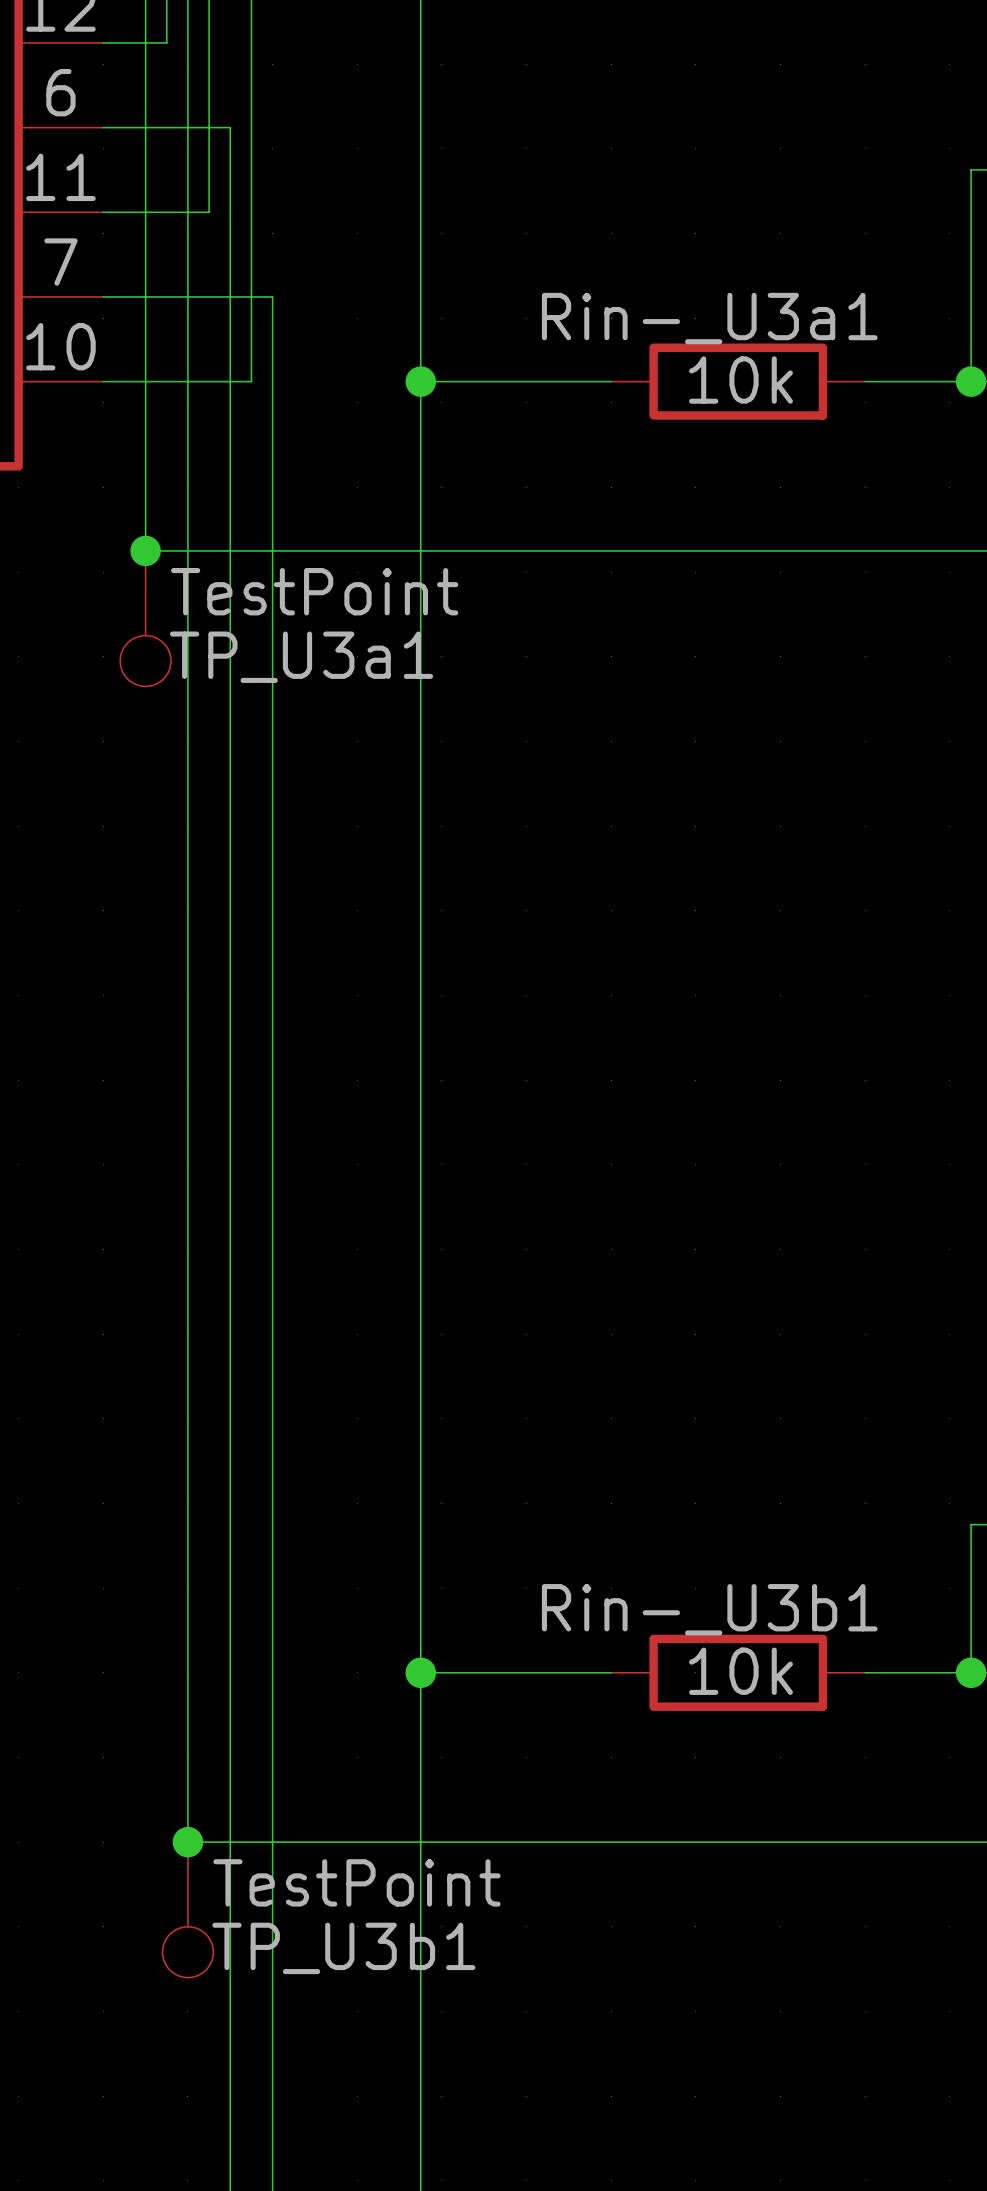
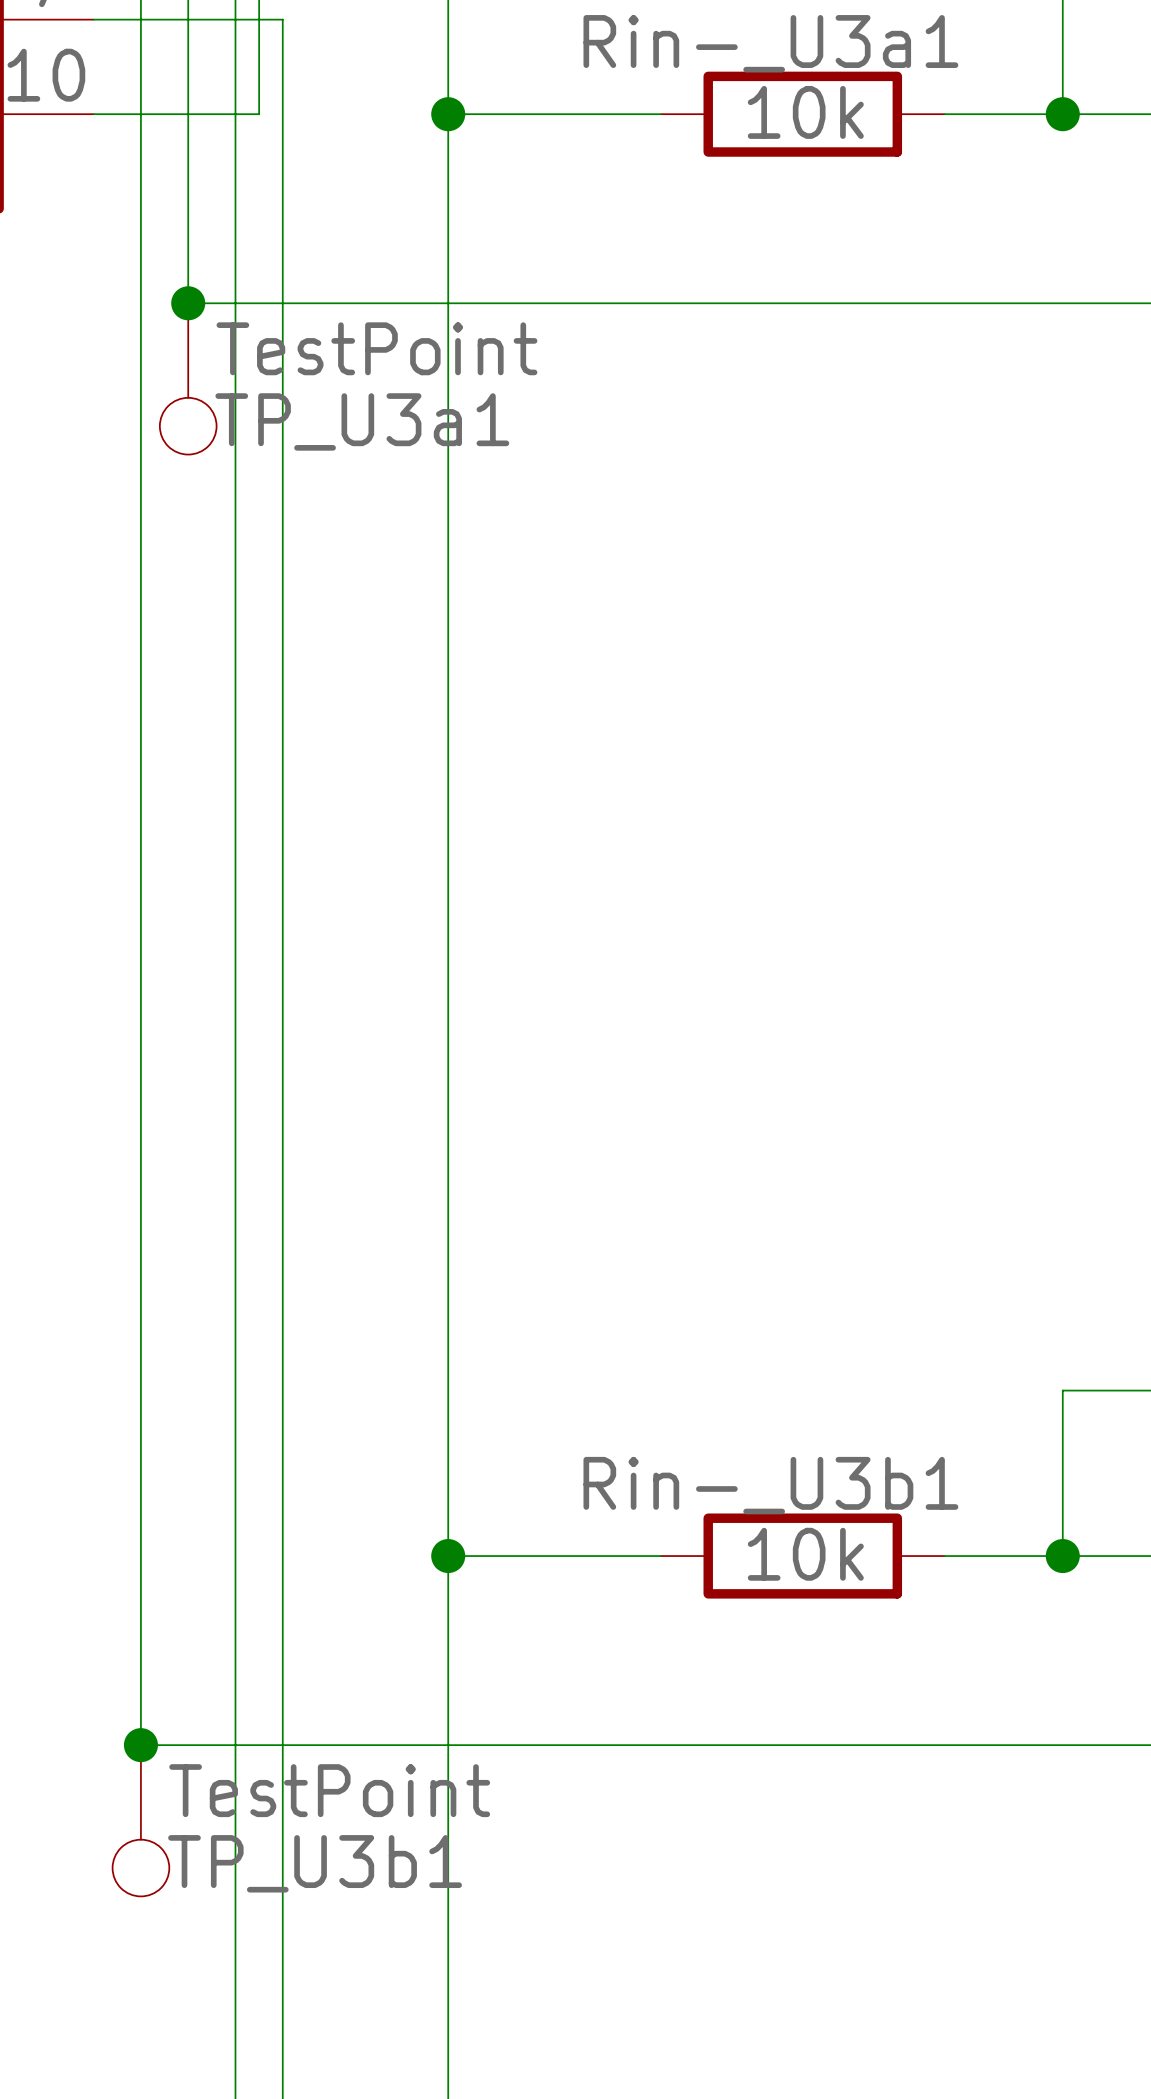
wire: (145, 550) (187, 550) (187, 1842) -> (140, 303) (140, 1745) (188, 1745)
junction position: (145, 550) -> (188, 303)
TP_U3a1 position: (145, 618) -> (188, 378)
junction position: (187, 1842) -> (140, 1745)
TP_U3b1 position: (187, 1909) -> (140, 1820)

